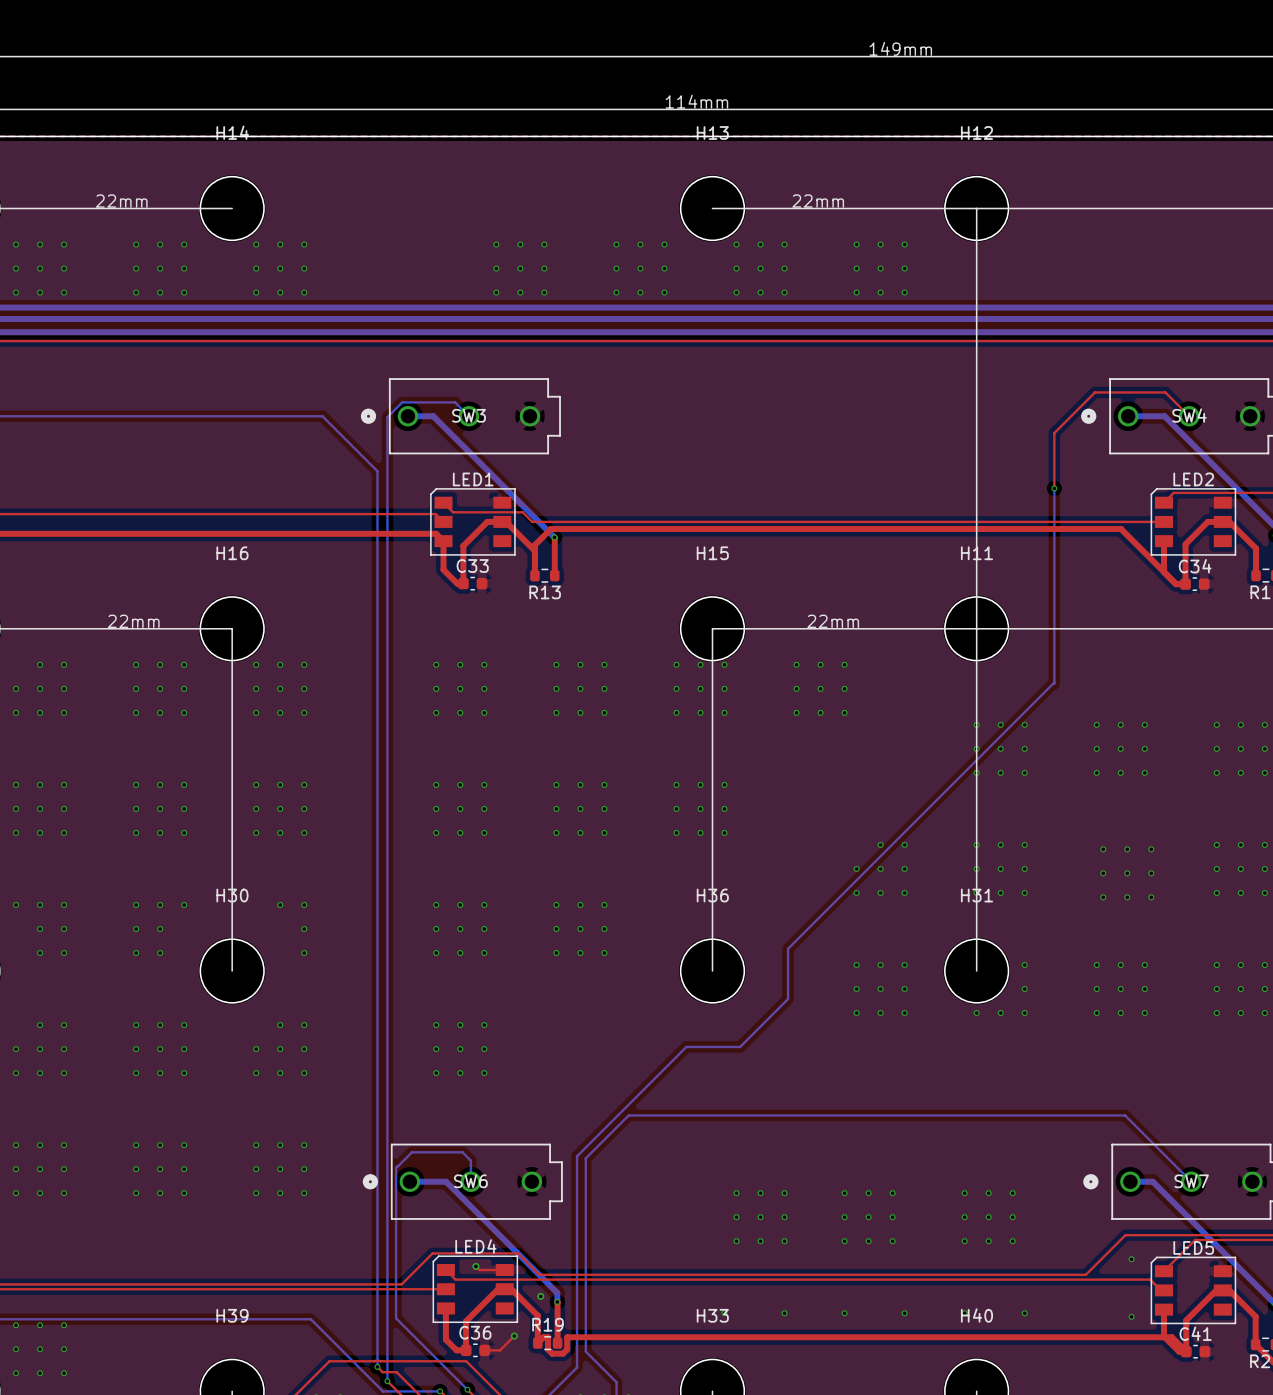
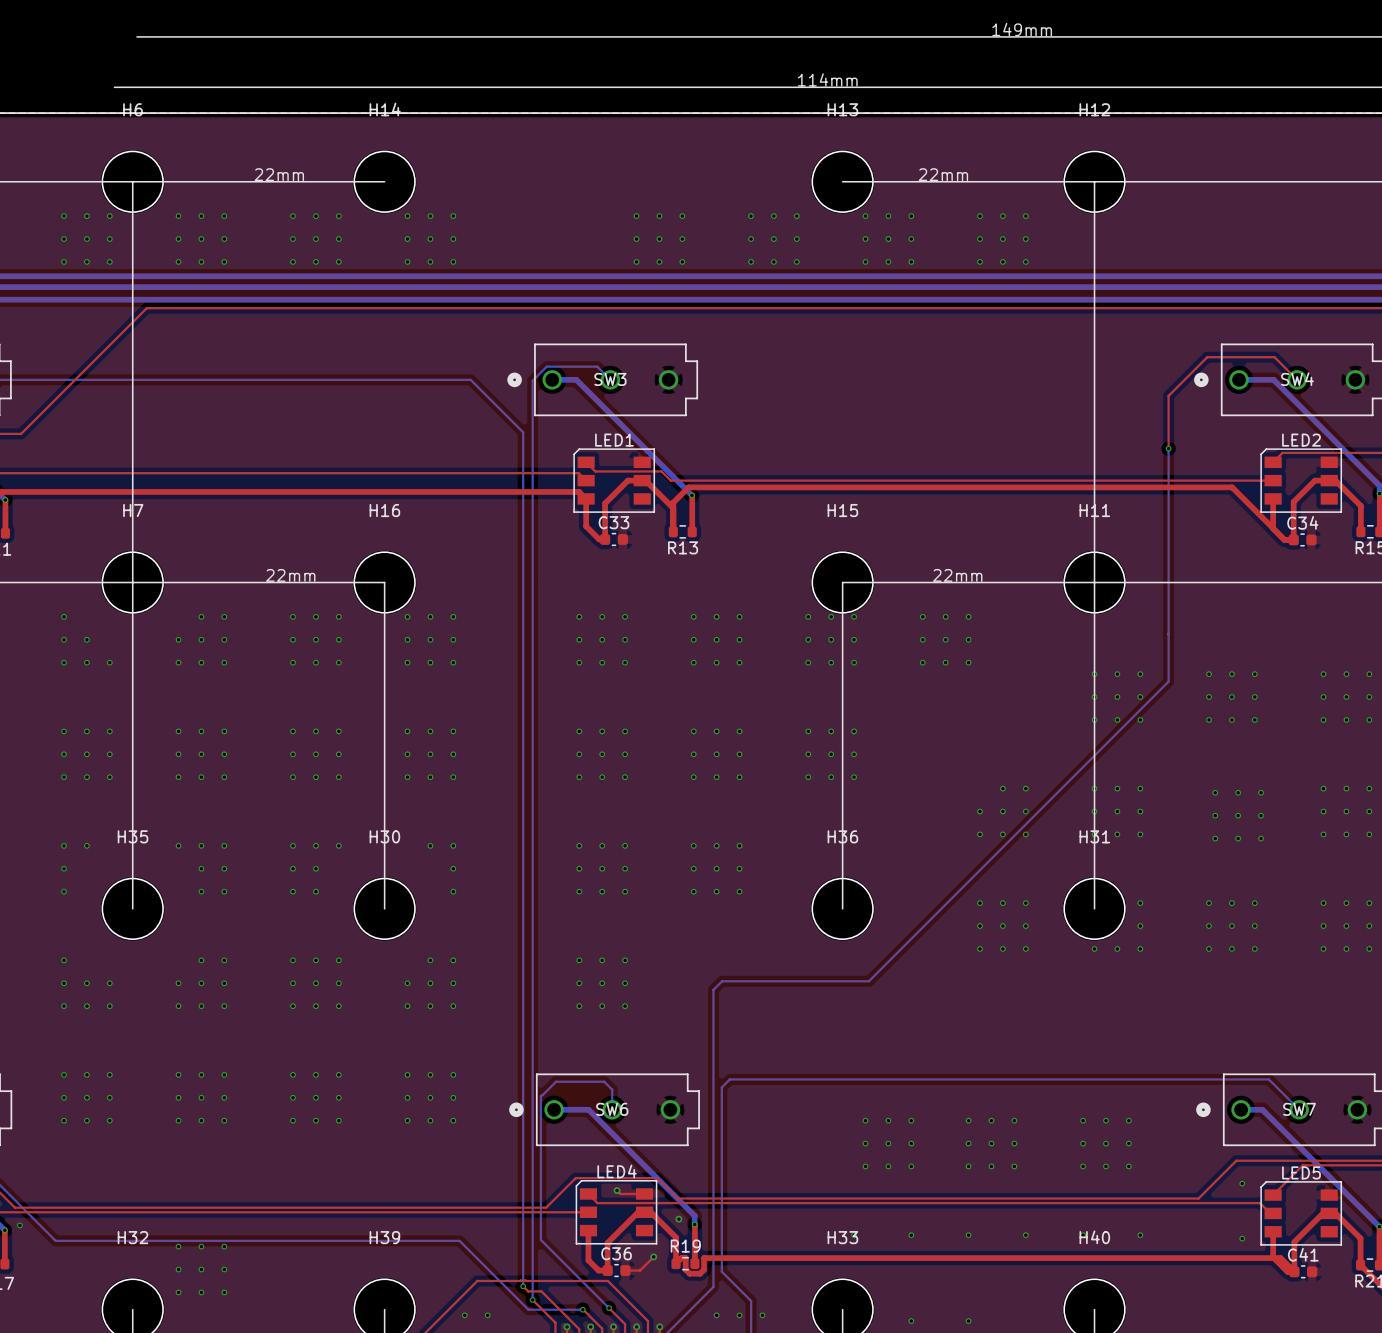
bottom track: (1054, 682) (788, 948) (788, 998) -> (1168, 634) (1168, 681) (914, 935)
bottom track: (686, 1046) (577, 1156) -> (817, 981) (722, 981) (713, 989) (713, 1085)
bottom track: (594, 1149) (628, 1115) (1125, 1115) (1159, 1149) -> (729, 1079) (1268, 1079)

